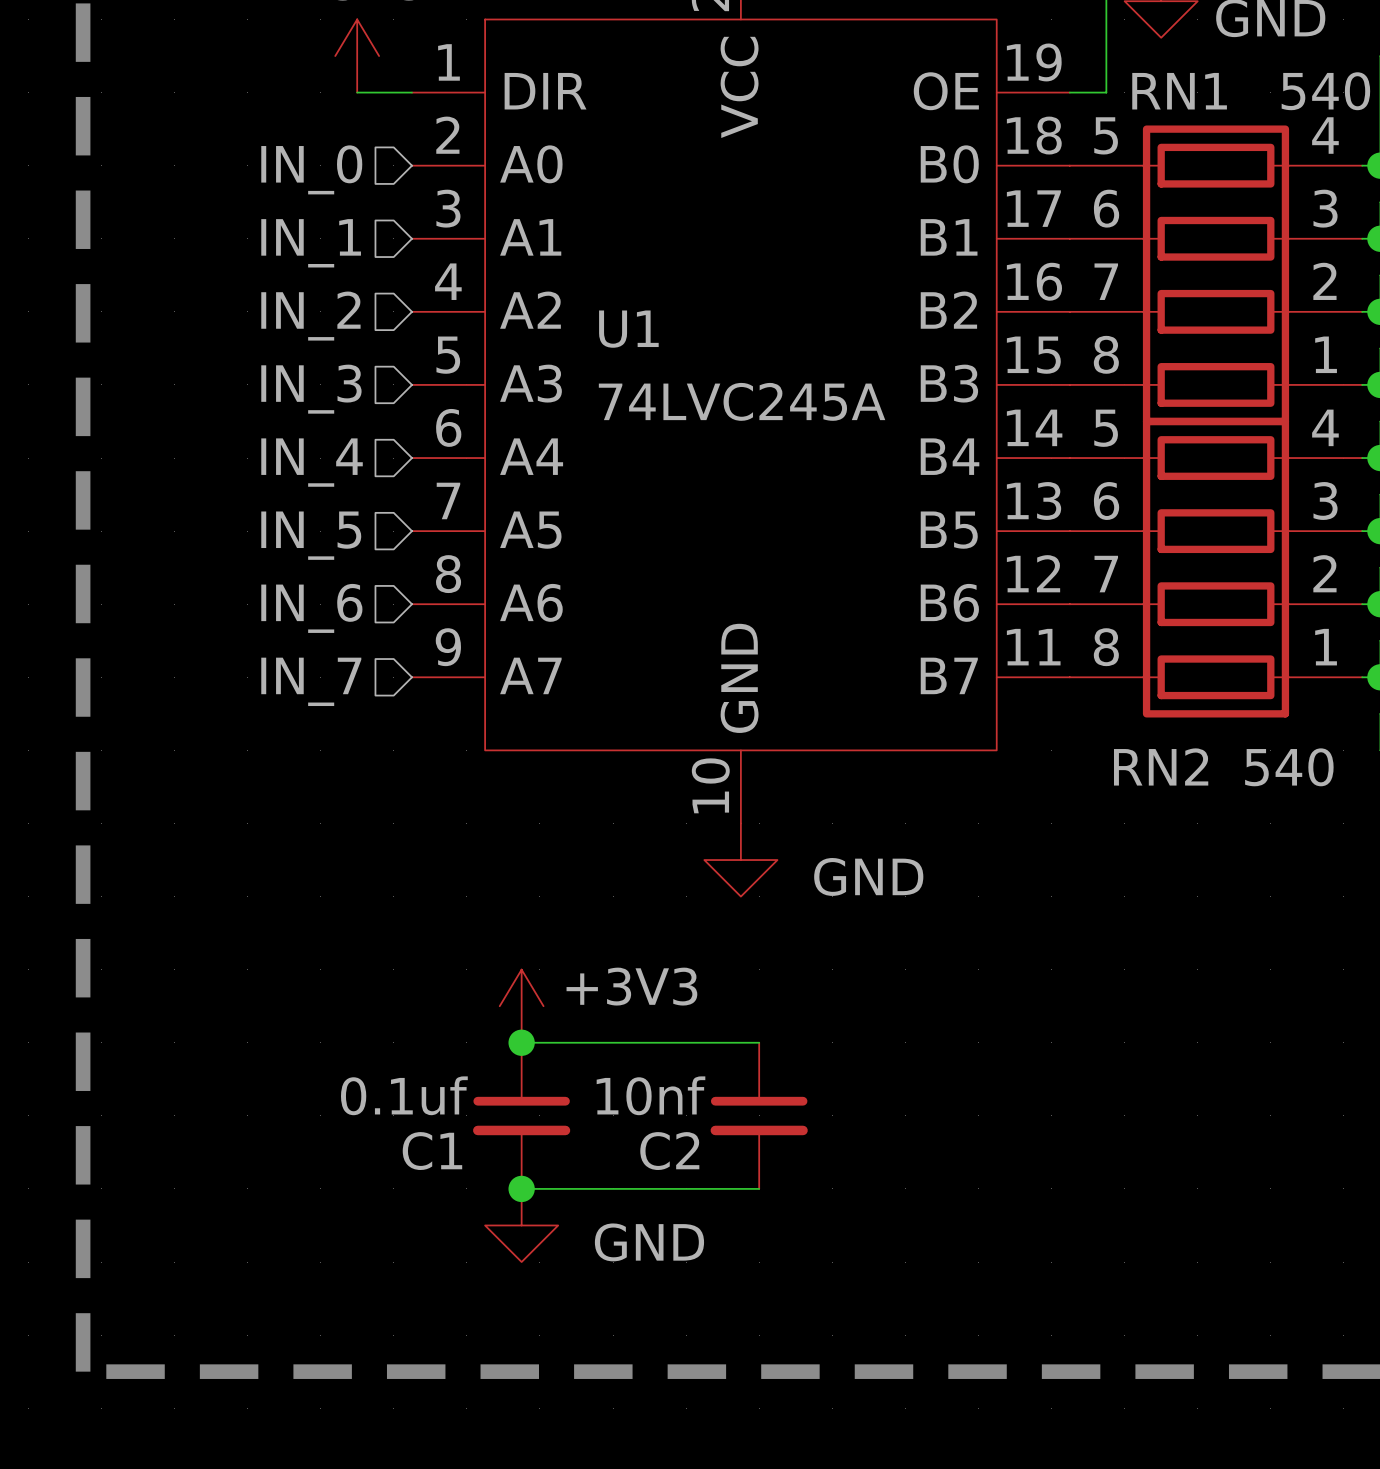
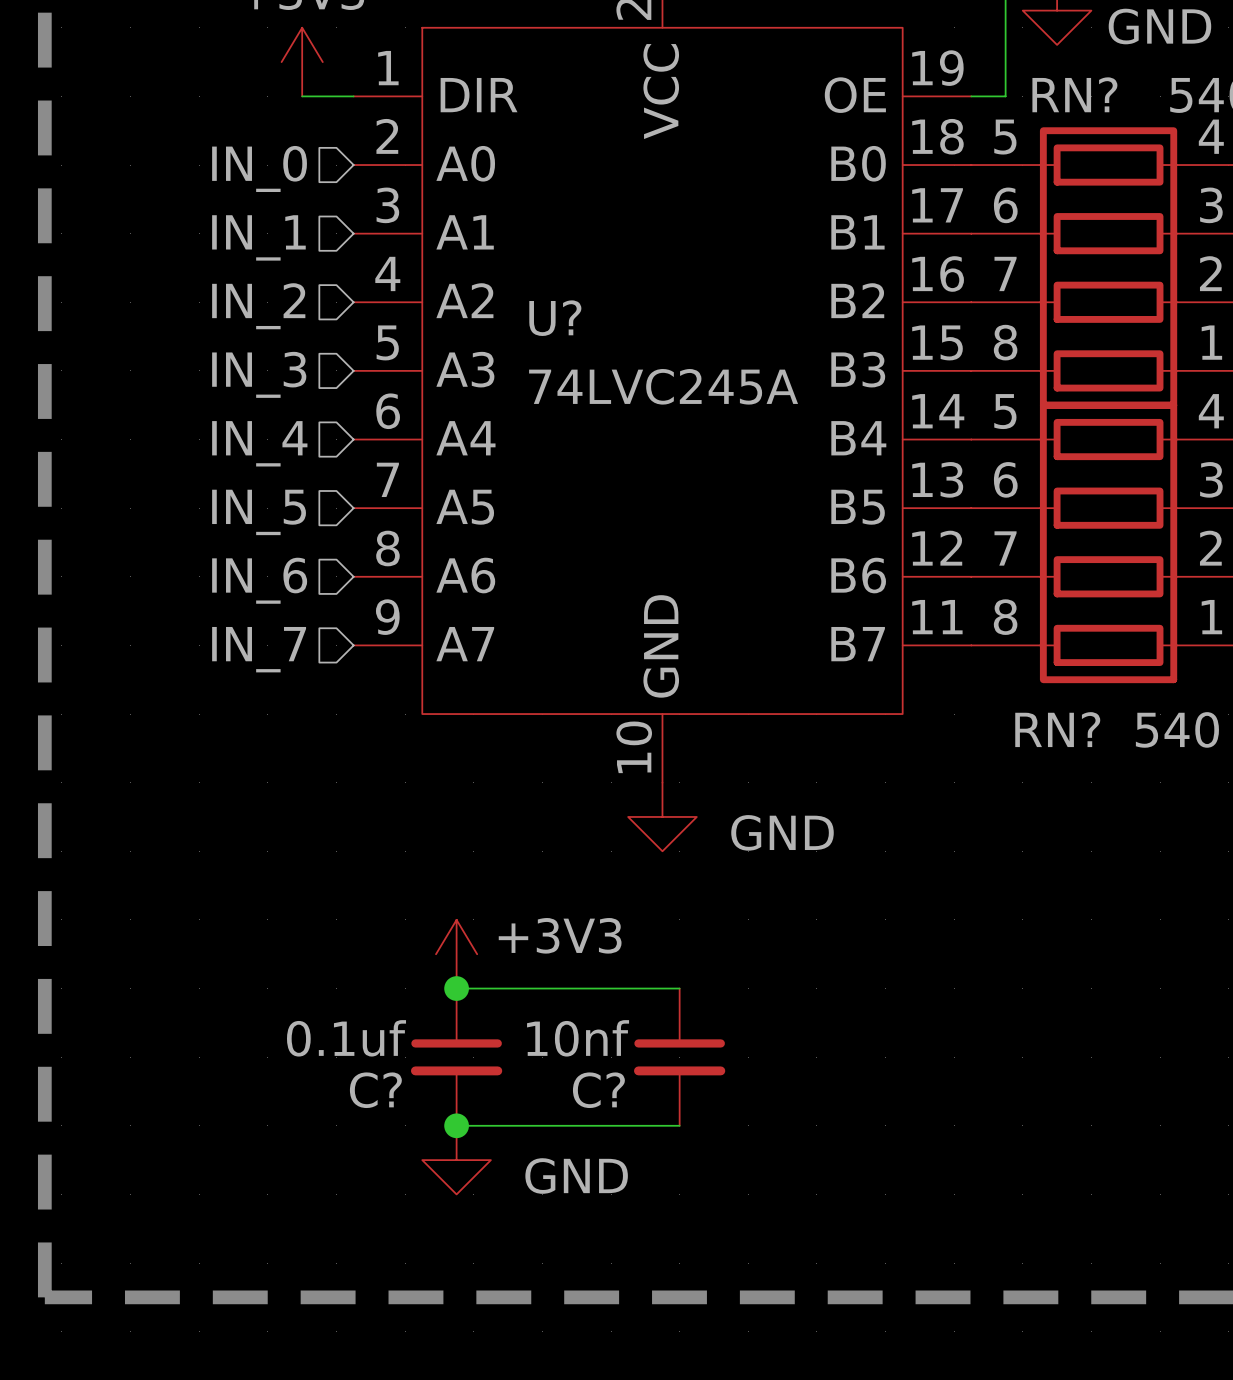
RN1 name: RN1 (1179, 91) -> RN? (1074, 94)
U1 name: U1 (628, 329) -> U? (555, 318)
RN2 name: RN2 (1161, 766) -> RN? (1057, 729)
C1 name: C1 (432, 1151) -> C? (375, 1090)
C2 name: C2 (669, 1151) -> C? (598, 1090)

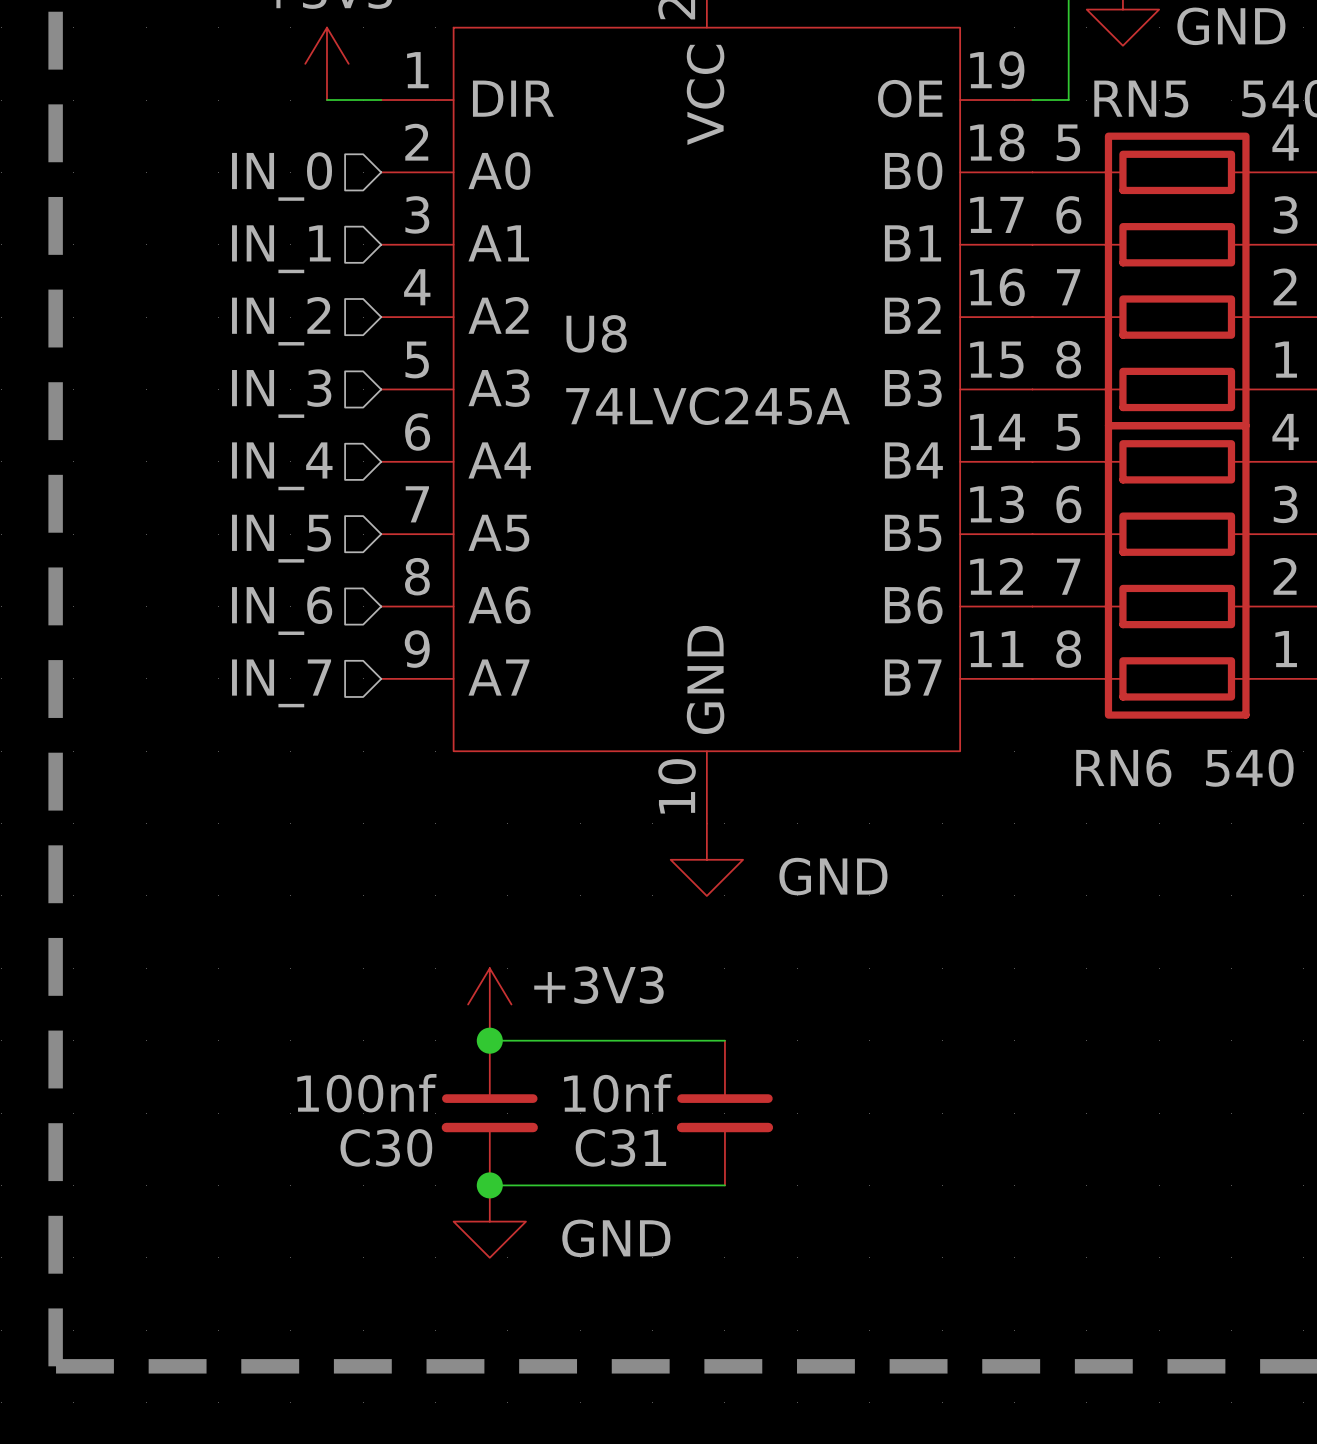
RN? name: RN? (1074, 94) -> RN5 (1141, 99)
U? name: U? (555, 318) -> U8 (596, 333)
RN? name: RN? (1057, 729) -> RN6 (1123, 768)
C? value: 0.1uf (346, 1038) -> 100nf (366, 1093)
C? name: C? (375, 1090) -> C30 (386, 1147)
C? name: C? (598, 1090) -> C31 (620, 1147)

